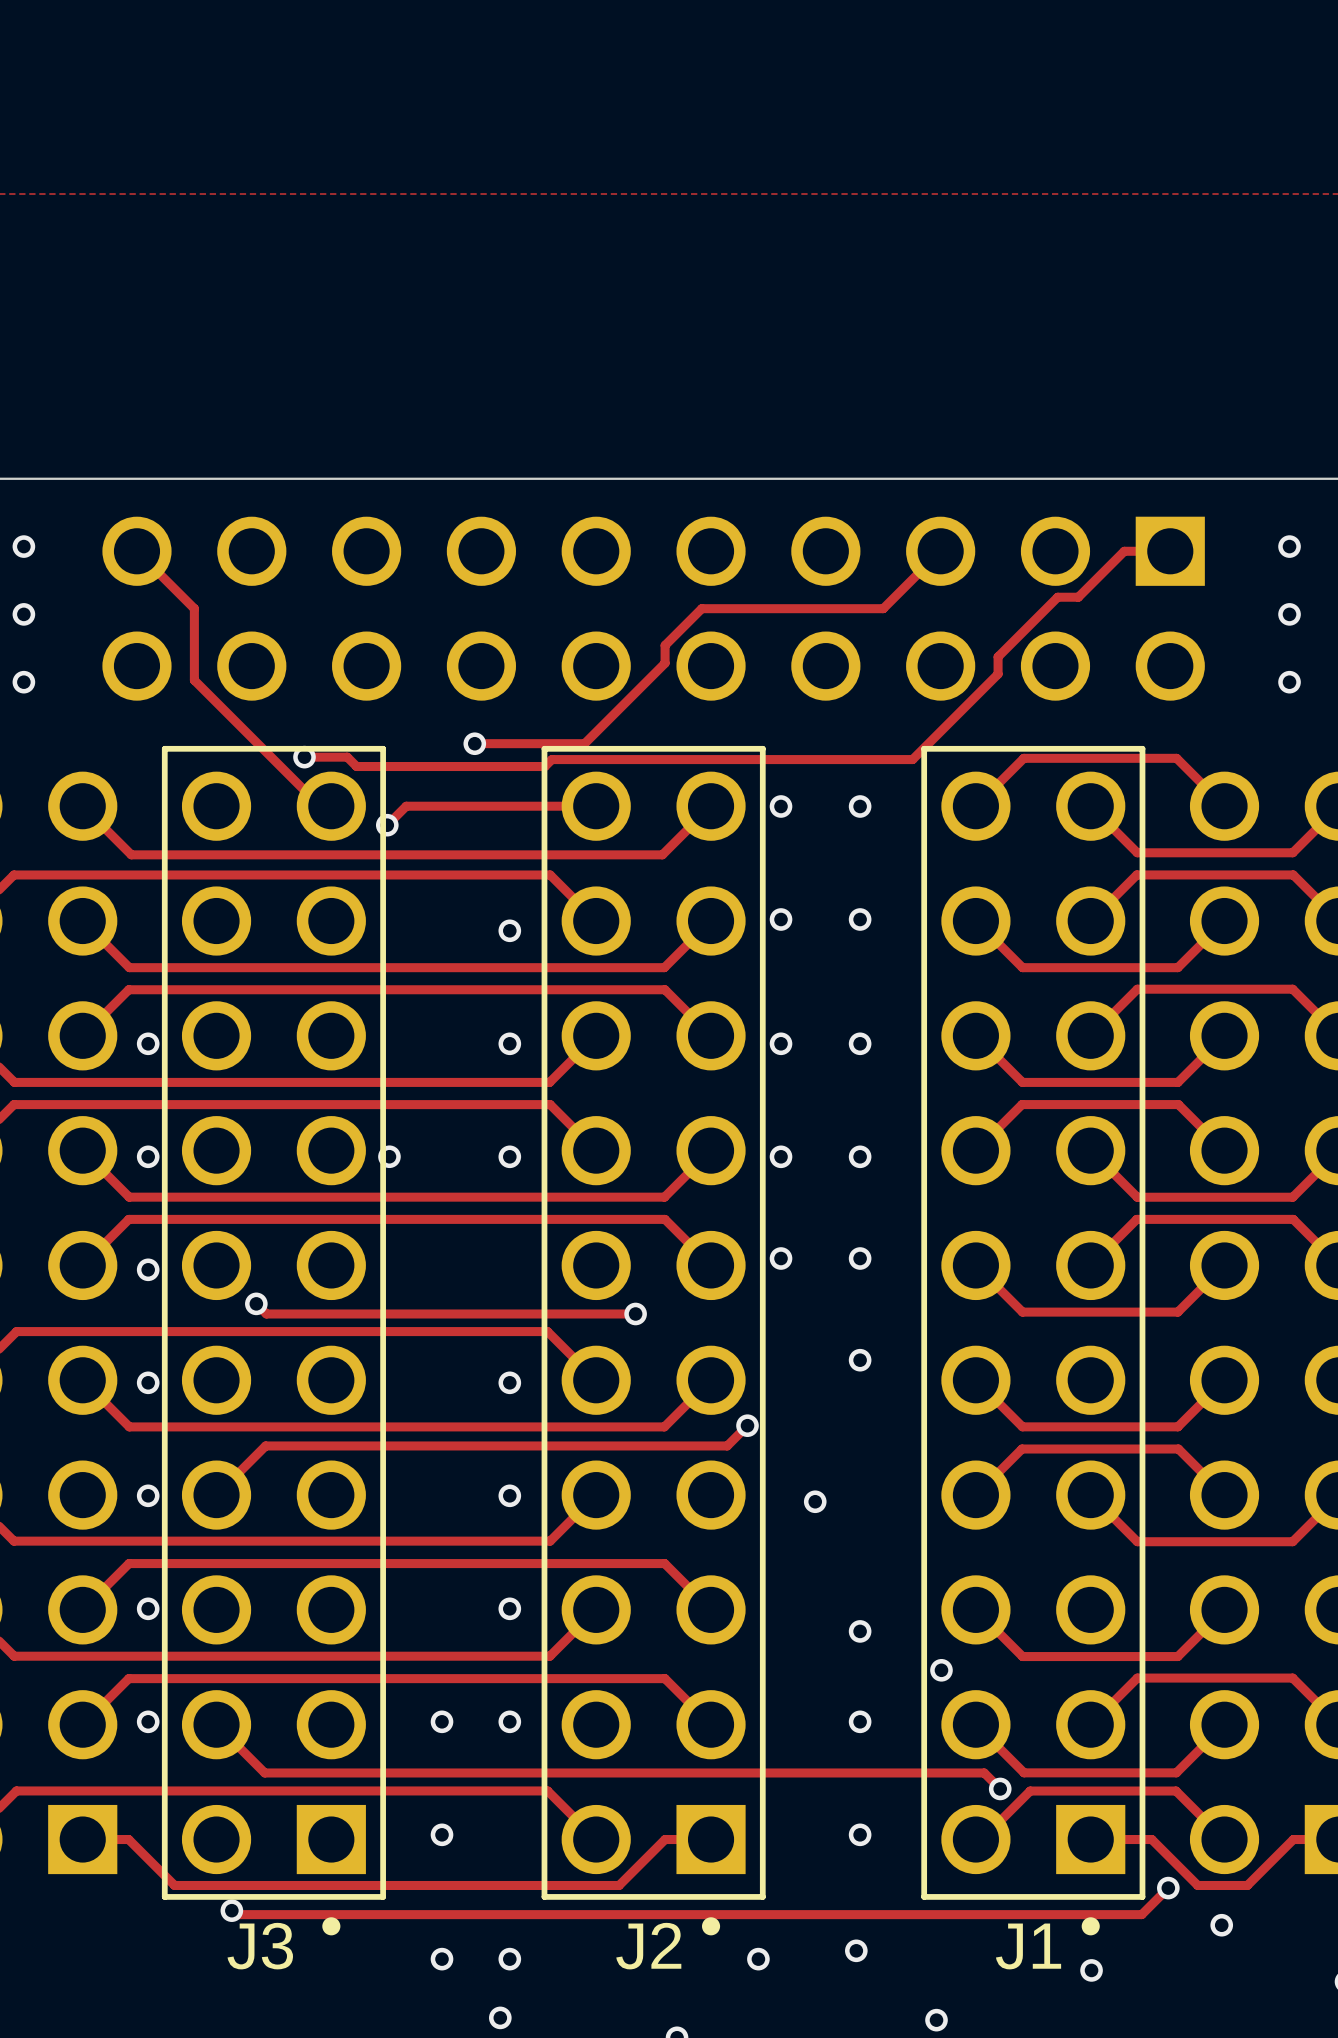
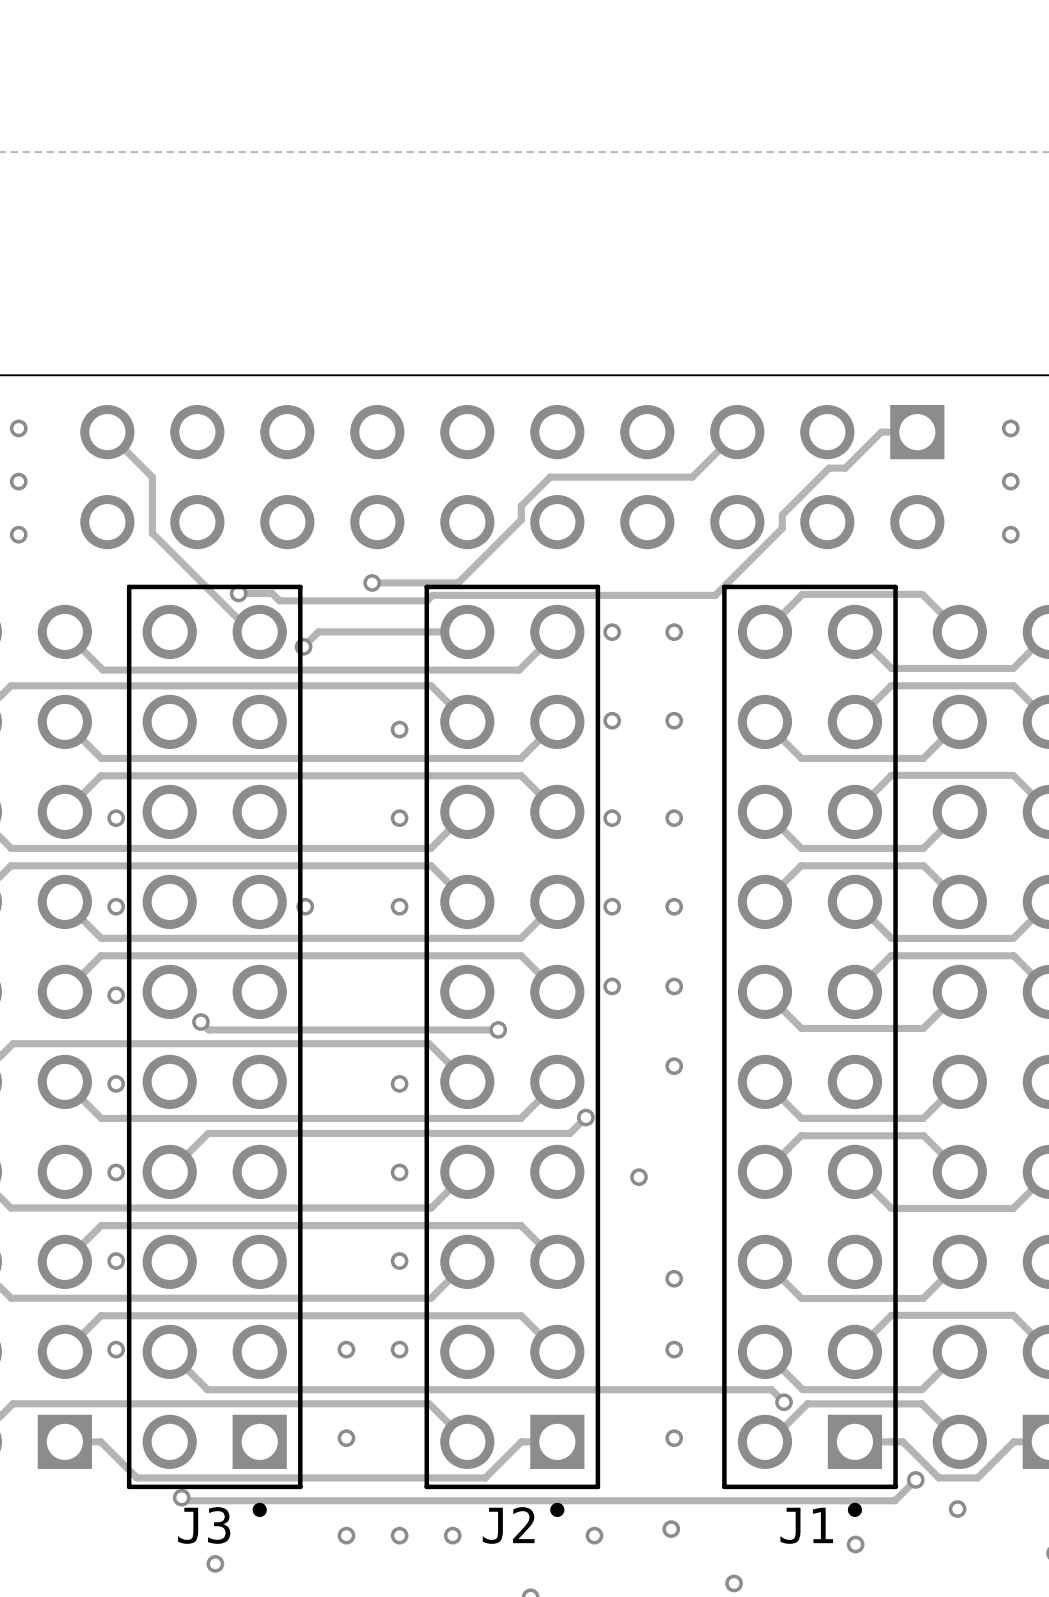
via: (941, 1670) -> none
via: none -> (452, 1535)
via: none -> (215, 1563)
via: (500, 2017) -> none

